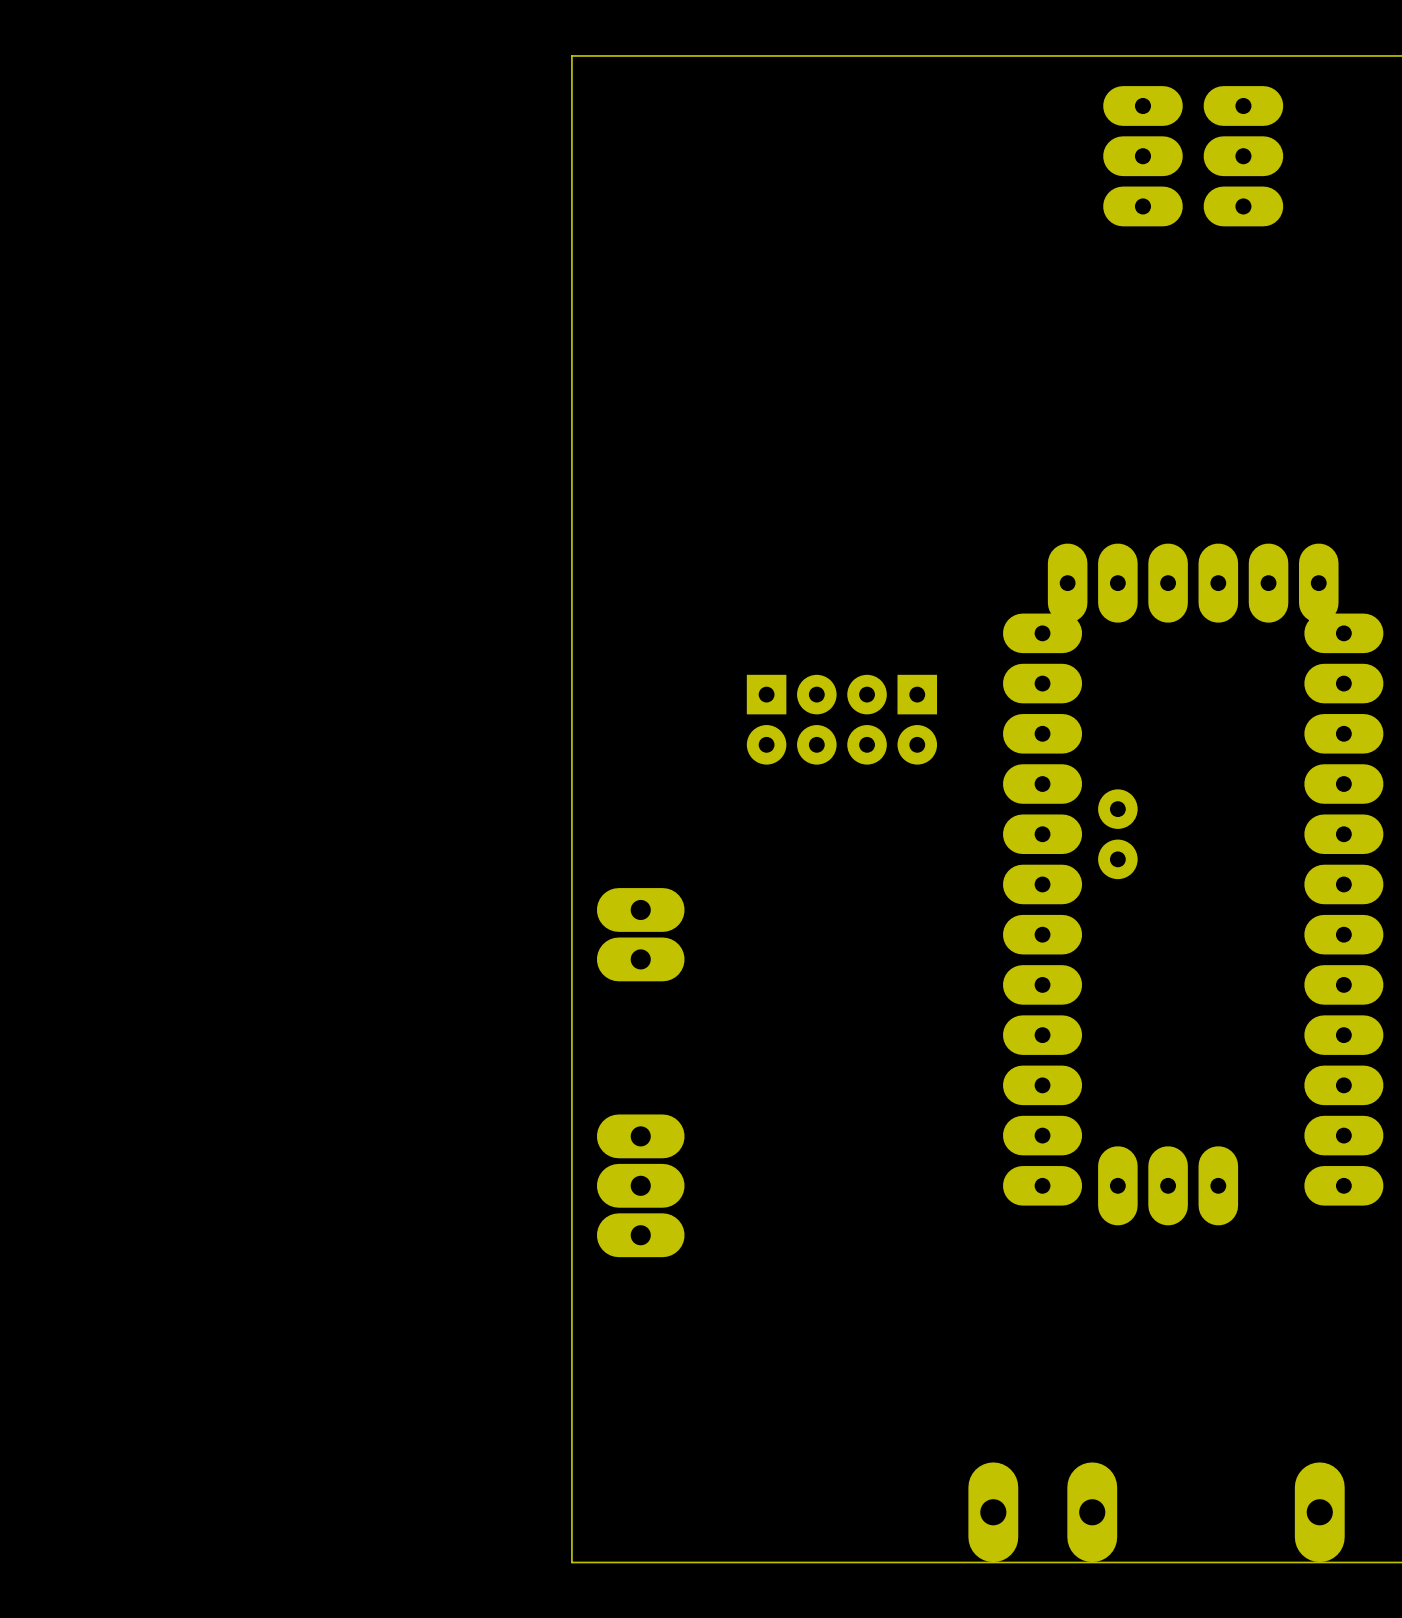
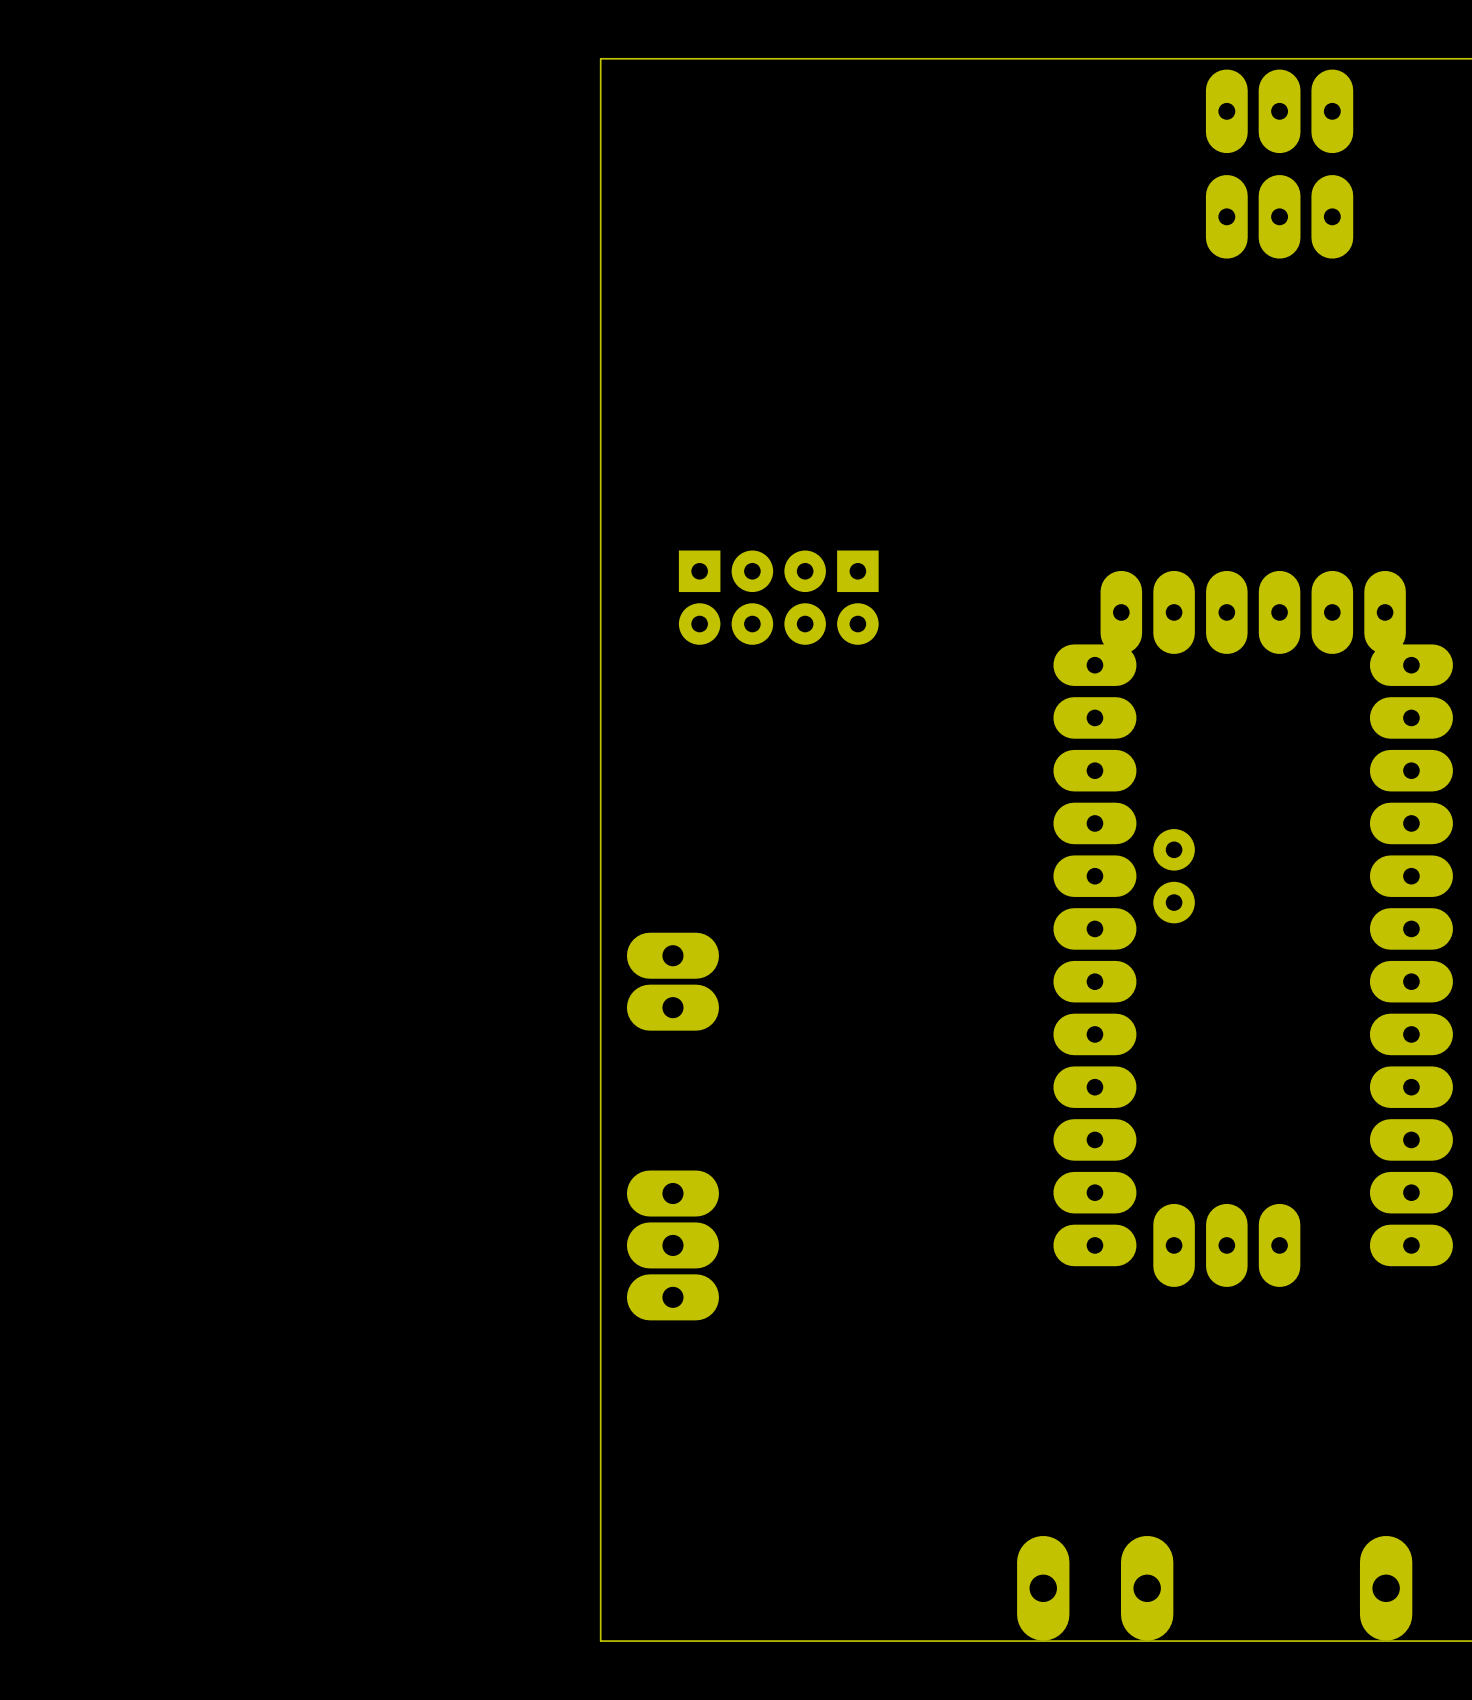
part rotation: 0° (1193, 156) -> 90° clockwise (1279, 164)
part position: (841, 719) -> (778, 597)

